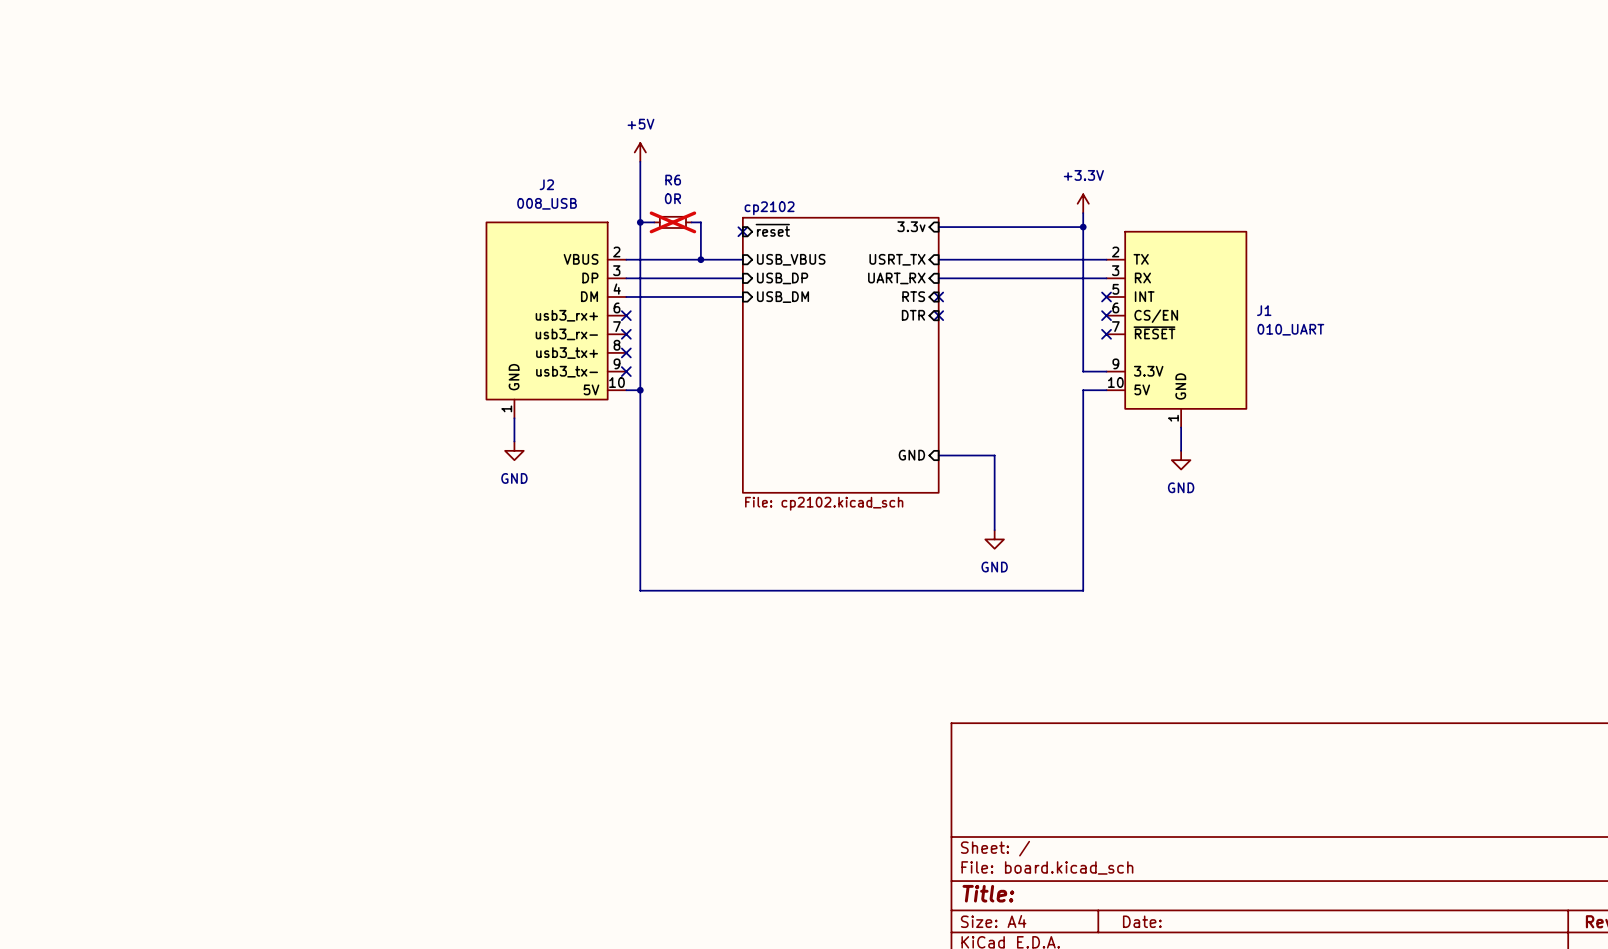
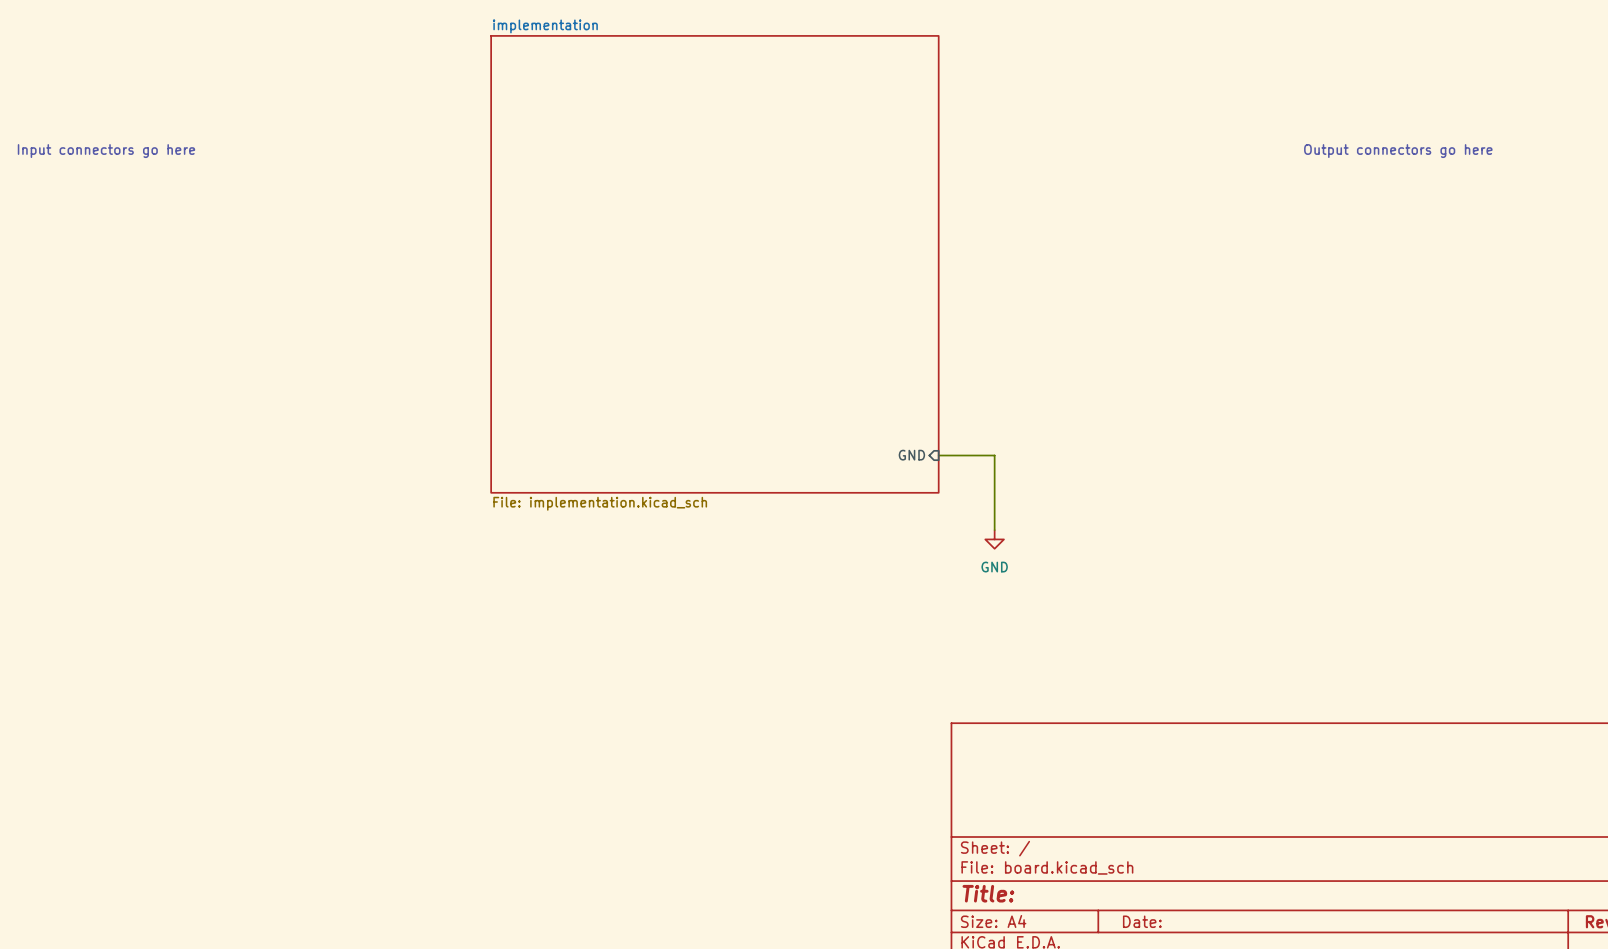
text: none -> Input connectors go here (106, 151)
text: none -> Output connectors go here (1398, 151)
power symbol: +5V (640, 152) -> none
wire: (640, 161) (640, 590) (1083, 590) (1083, 390) (1106, 390) -> none
power symbol: +3.3V (1083, 203) -> none
wire: (1083, 213) (1083, 371) (1106, 371) -> none
wire: (640, 222) (654, 222) -> none
junction: (640, 222) -> none
R6: 0R (672, 222) -> none
wire: (691, 222) (700, 222) (700, 259) -> none
sheet pin: 3.3v (911, 226) -> none
wire: (938, 227) (1083, 227) -> none
junction: (1083, 227) -> none
sheet pin: ~{reset} (772, 230) -> none
no-connect mark: (742, 231) -> none
wire: (626, 259) (742, 259) -> none
junction: (700, 259) -> none
sheet pin: USB_VBUS (791, 259) -> none
sheet pin: USRT_TX (897, 259) -> none
wire: (938, 259) (1106, 259) -> none
sheet implementation: none -> File: implementation.kicad_sch (714, 264)
wire: (626, 278) (742, 278) -> none
sheet pin: USB_DP (782, 278) -> none
sheet pin: UART_RX (896, 278) -> none
wire: (938, 278) (1106, 278) -> none
wire: (626, 296) (742, 296) -> none
sheet pin: RTS (913, 296) -> none
no-connect mark: (938, 296) -> none
no-connect mark: (1106, 296) -> none
sheet pin: USB_DM (782, 297) -> none
no-connect mark: (626, 315) -> none
sheet pin: DTR (913, 315) -> none
no-connect mark: (938, 315) -> none
no-connect mark: (1106, 315) -> none
J2: 008_USB (556, 320) -> none
J1: 010_UART (1176, 329) -> none
no-connect mark: (626, 334) -> none
no-connect mark: (1106, 334) -> none
no-connect mark: (626, 352) -> none
sheet cp2102: File: cp2102.kicad_sch (840, 355) -> none
no-connect mark: (626, 371) -> none
wire: (626, 390) (640, 390) -> none
junction: (640, 390) -> none
wire: (514, 418) (514, 441) -> none
wire: (1181, 427) (1181, 450) -> none
power symbol: GND (514, 450) -> none
power symbol: GND (1181, 460) -> none

